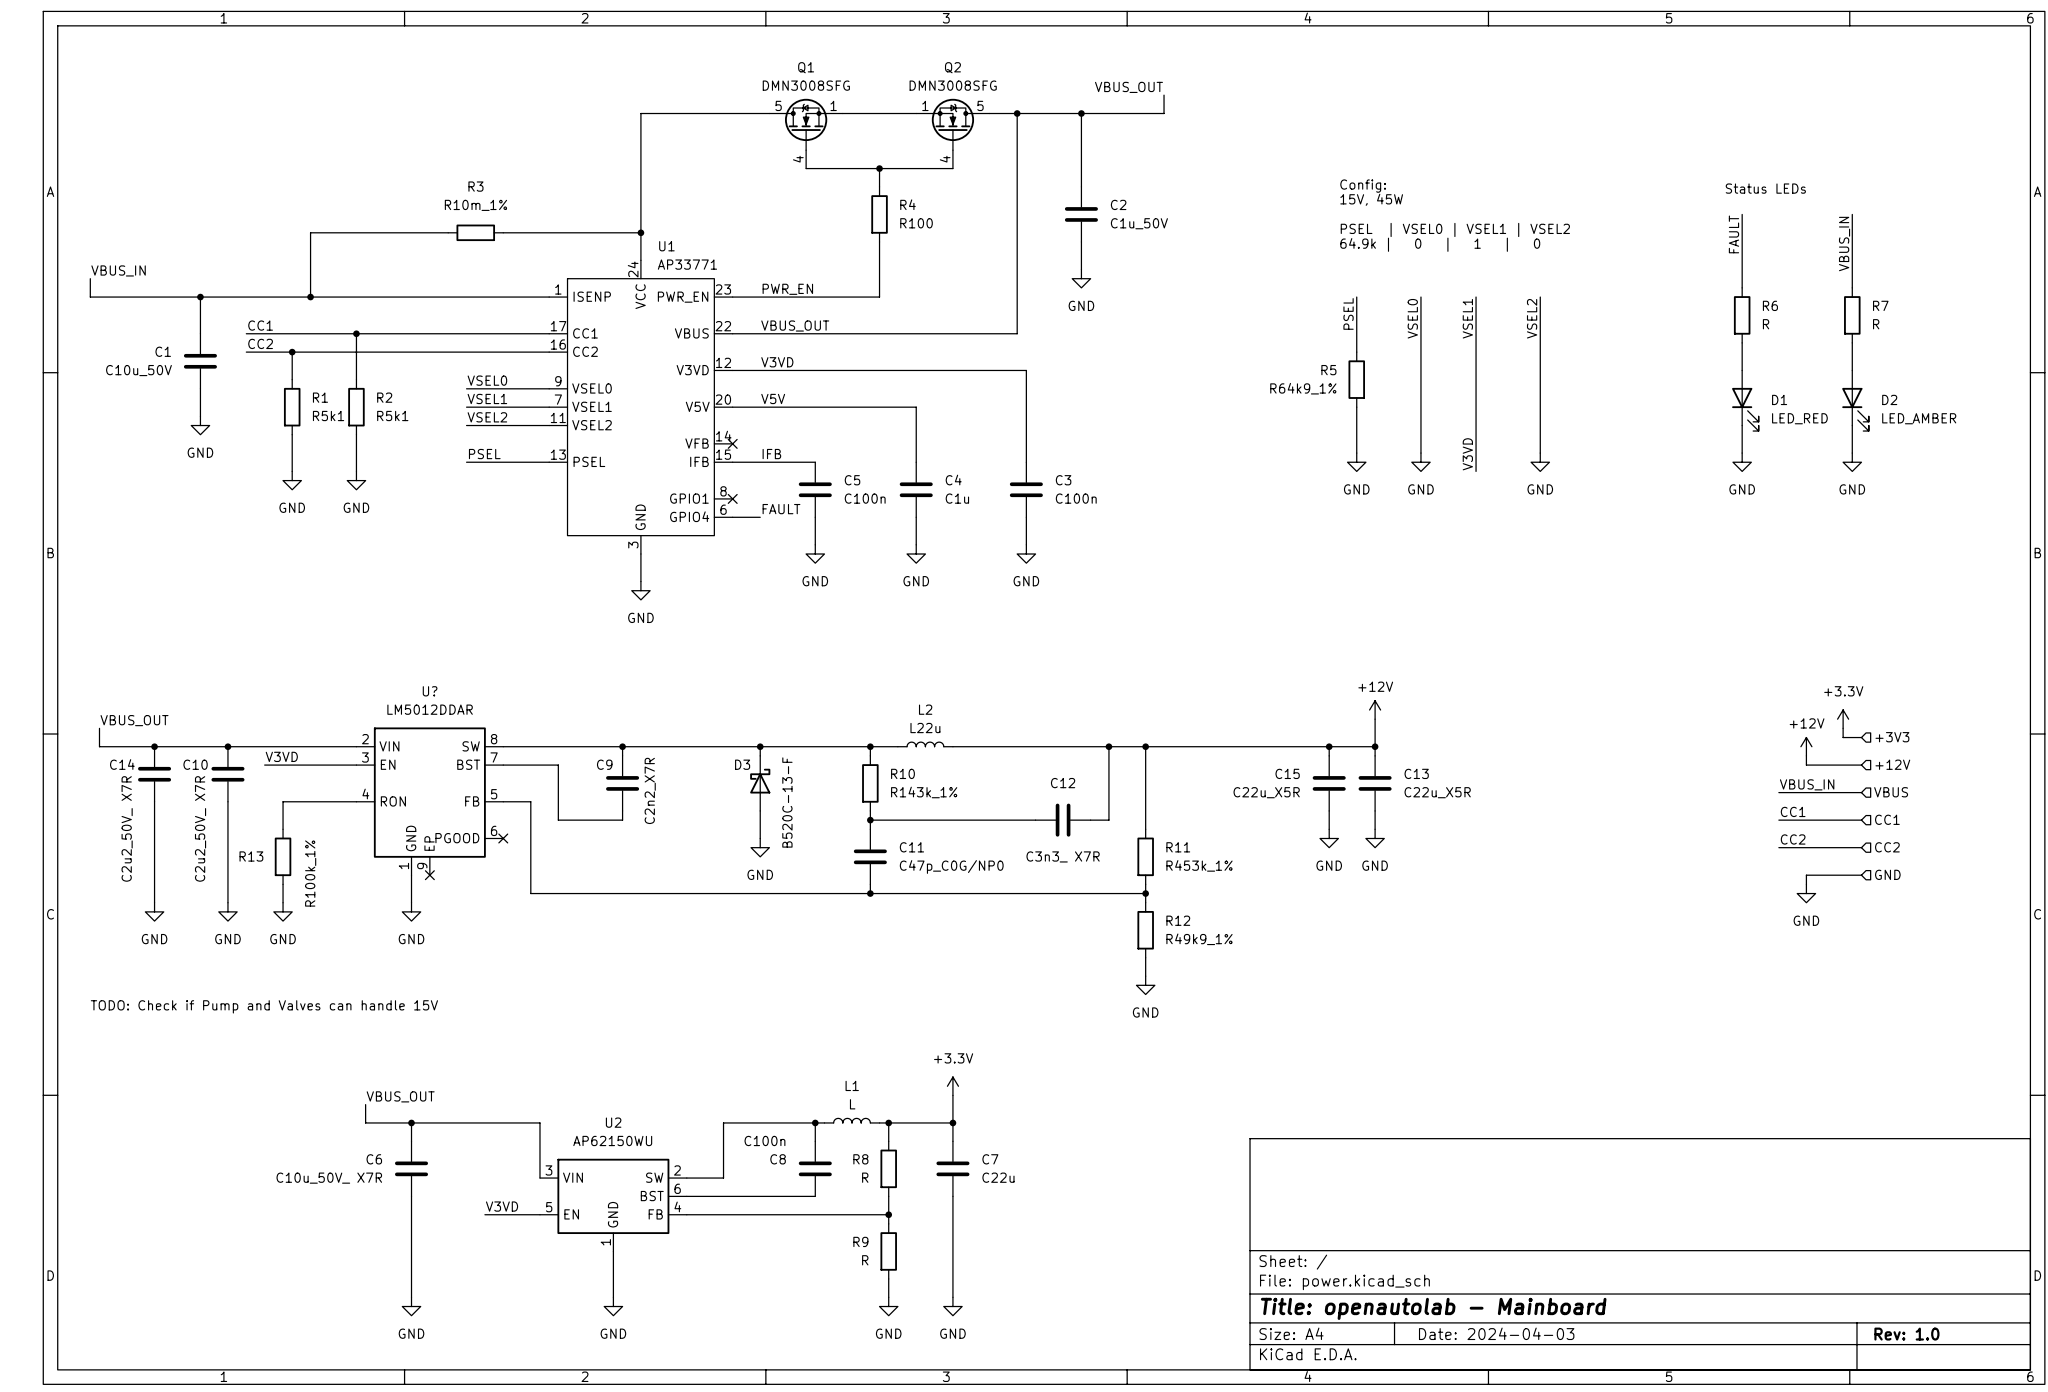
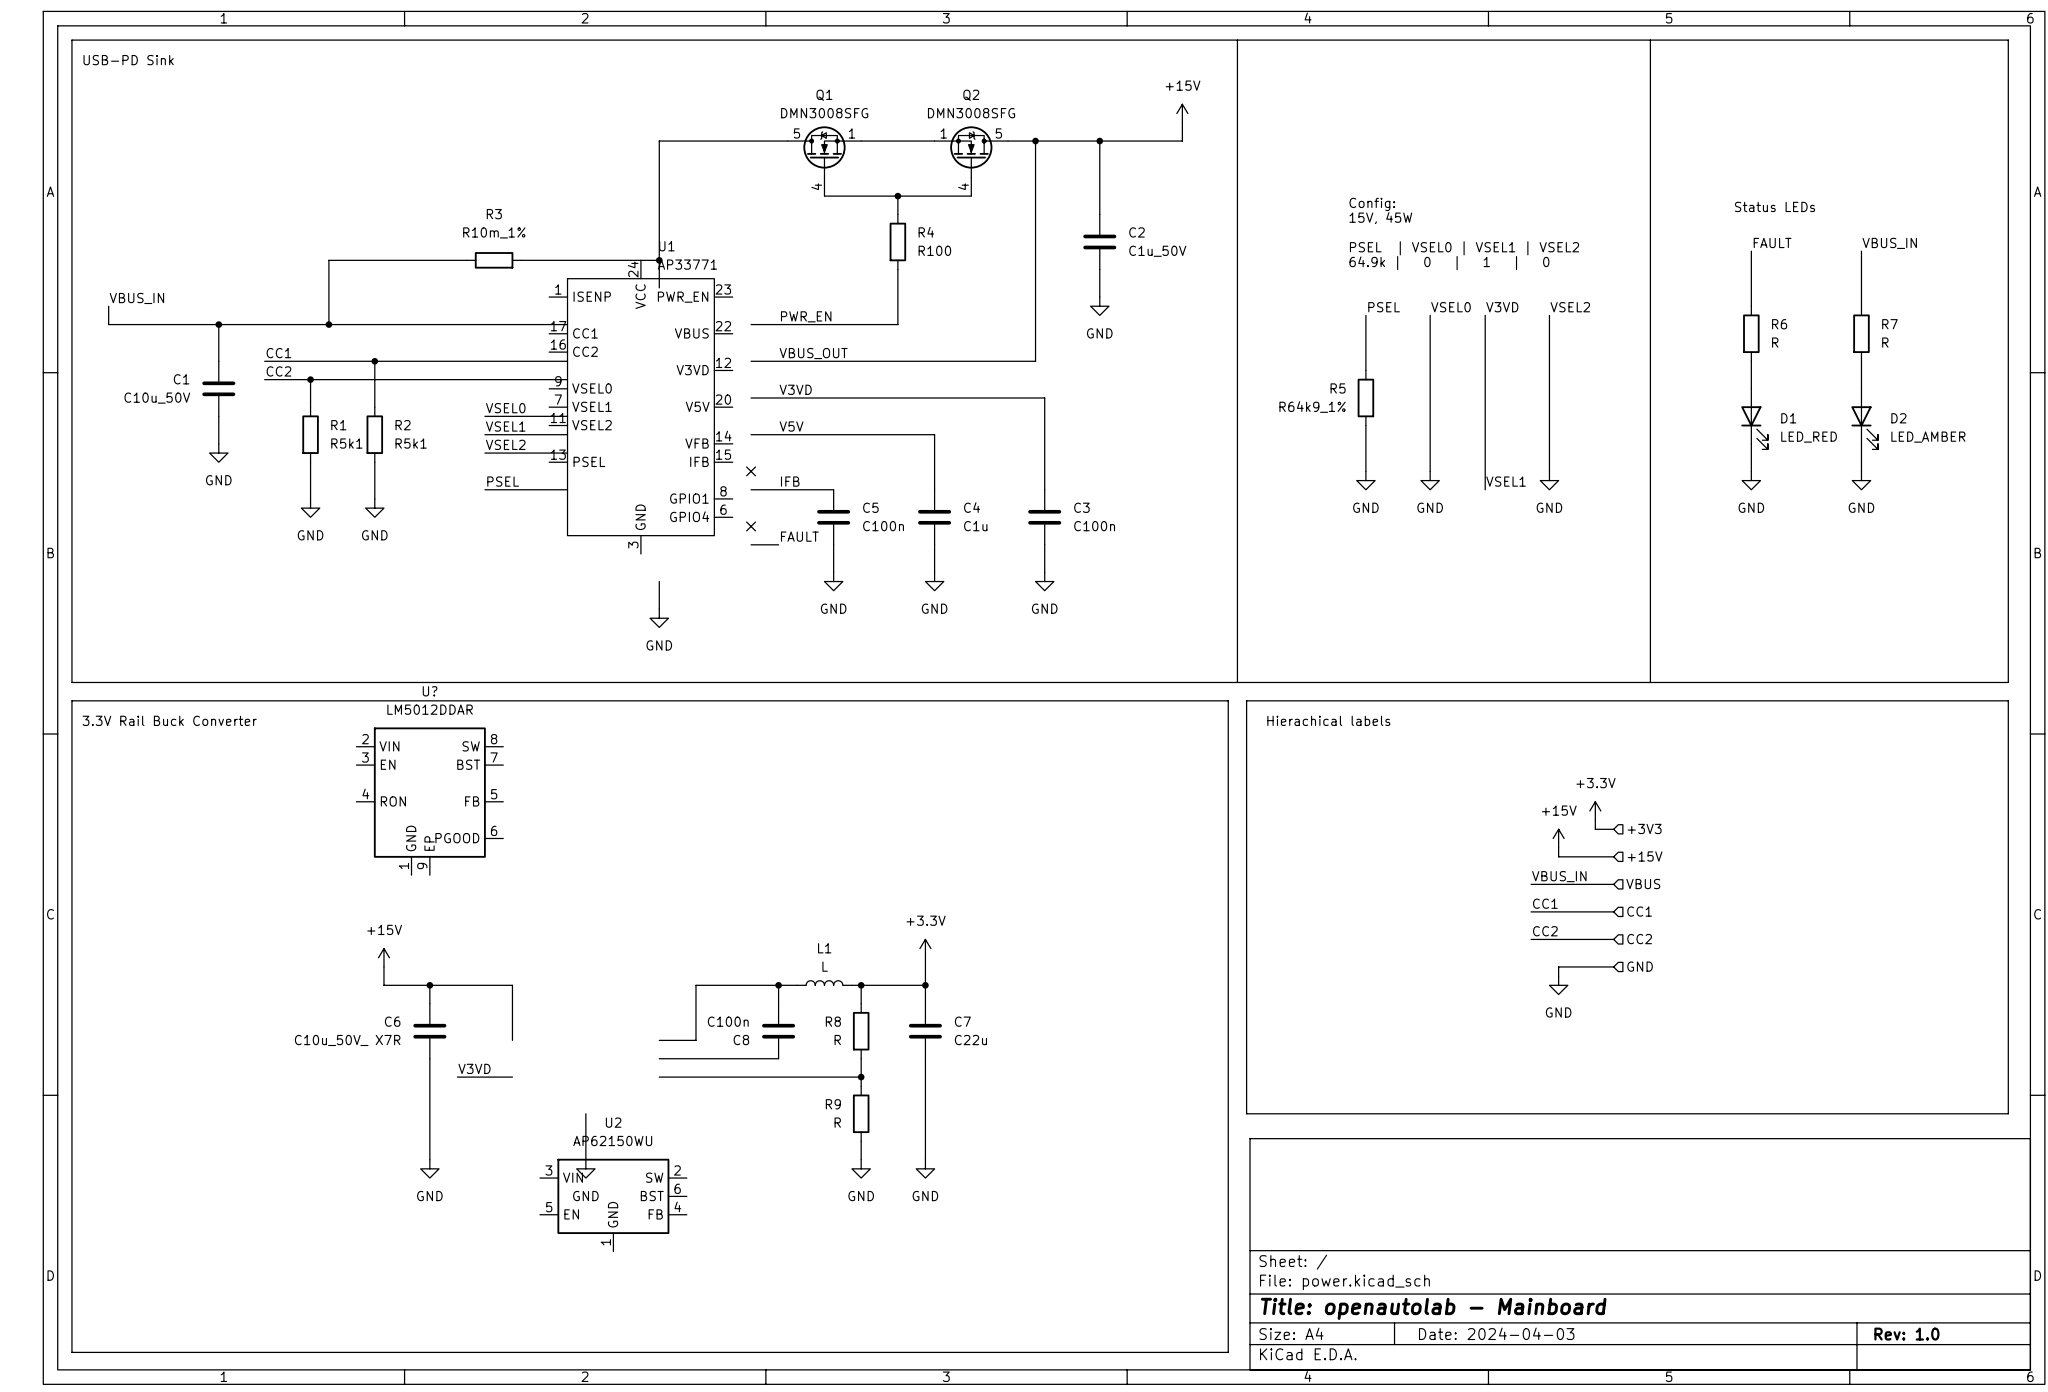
line: none -> (71, 40) (71, 682) (2008, 682) (2008, 40) (71, 40)
line: none -> (1237, 40) (1237, 682)
line: none -> (1650, 40) (1650, 682)
text: none -> USB-PD Sink (128, 60)
label: VBUS_OUT (1128, 87) -> none
wire: (1164, 95) (1164, 113) (989, 113) -> (1182, 122) (1182, 141) (1008, 141)
wire: (769, 113) (640, 113) (640, 260) -> (787, 141) (659, 141) (659, 287)
wire: (842, 113) (916, 113) -> (861, 141) (934, 141)
wire: (1017, 113) (1017, 333) (732, 333) -> (1035, 141) (1035, 361) (751, 361)
junction: (1017, 113) -> none
wire: (1081, 113) (1081, 186) -> (1099, 141) (1099, 214)
junction: (1081, 113) -> none
power symbol: none -> +15V (1182, 113)
Q1 position: (806, 133) -> (824, 161)
Q2 position: (952, 133) -> (971, 161)
junction: none -> (1035, 141)
junction: none -> (1099, 141)
wire: (806, 168) (952, 168) -> (824, 196) (971, 196)
wire: (879, 168) (879, 186) -> (897, 196) (897, 214)
junction position: (879, 168) -> (897, 196)
text position: Config: (1363, 186) -> Config: (1372, 204)
text position: Status LEDs (1765, 188) -> Status LEDs (1775, 206)
text position: 15V, 45W (1371, 199) -> 15V, 45W (1380, 218)
R4 position: (879, 214) -> (897, 241)
C2 position: (1081, 214) -> (1099, 241)
wire: (1742, 214) (1742, 287) -> none
wire: (1852, 214) (1852, 287) -> none
text position: PSEL | VSEL0 | VSEL1 | VSEL2 (1455, 229) -> PSEL | VSEL0 | VSEL1 | VSEL2 (1464, 248)
wire: (448, 232) (310, 232) (310, 297) -> (466, 260) (328, 260) (328, 324)
R3 position: (475, 232) -> (494, 260)
wire: (503, 232) (640, 232) -> (521, 260) (659, 260)
junction position: (640, 232) -> (659, 260)
label rotation: 0° (1733, 234) -> 90° clockwise (1772, 242)
wire: (879, 241) (879, 297) (732, 297) -> (897, 269) (897, 324) (751, 324)
wire: (1081, 241) (1081, 269) -> (1099, 269) (1099, 297)
text position: 64.9k | 0 | 1 | 0 (1440, 244) -> 64.9k | 0 | 1 | 0 (1449, 263)
label rotation: 0° (1844, 244) -> 90° clockwise (1889, 243)
wire: none -> (1751, 251) (1751, 306)
wire: none -> (1861, 251) (1861, 306)
label position: VBUS_IN (118, 270) -> VBUS_IN (136, 298)
wire: (90, 278) (90, 297) (549, 297) -> (108, 306) (108, 324) (567, 324)
power symbol position: GND (1081, 278) -> GND (1099, 306)
label position: PWR_EN (787, 289) -> PWR_EN (806, 316)
wire: (200, 297) (200, 333) -> (218, 324) (218, 361)
junction position: (200, 297) -> (218, 324)
junction: (310, 297) -> none
wire: (1356, 297) (1356, 352) -> (1365, 315) (1365, 370)
wire: (1420, 297) (1420, 453) -> (1430, 315) (1430, 471)
wire: (1476, 297) (1476, 471) -> (1485, 315) (1485, 489)
wire: (1540, 297) (1540, 453) -> (1549, 315) (1549, 471)
label rotation: 0° (1348, 313) -> 90° clockwise (1384, 307)
R6 position: (1742, 315) -> (1751, 333)
R7 position: (1852, 315) -> (1861, 333)
label rotation: 0° (1412, 318) -> 90° clockwise (1450, 307)
label: VSEL1 (1467, 318) -> none
label rotation: 0° (1532, 318) -> 90° clockwise (1570, 307)
junction: none -> (328, 324)
label position: CC1 (260, 325) -> CC1 (278, 353)
label position: VBUS_OUT (795, 326) -> VBUS_OUT (813, 353)
wire: (246, 333) (549, 333) -> (264, 361) (567, 361)
wire: (356, 333) (356, 379) -> (374, 361) (374, 407)
junction: (356, 333) -> none
wire: (1742, 342) (1742, 370) -> (1751, 361) (1751, 388)
wire: (1852, 342) (1852, 370) -> (1861, 361) (1861, 388)
label position: CC2 (260, 343) -> CC2 (278, 371)
wire: (246, 352) (549, 352) -> (264, 379) (567, 379)
wire: (292, 352) (292, 379) -> (310, 379) (310, 407)
junction: (292, 352) -> none
C1 position: (200, 361) -> (218, 388)
junction: none -> (374, 361)
label position: V3VD (777, 362) -> V3VD (795, 389)
wire: (732, 370) (1026, 370) (1026, 462) -> (751, 397) (1044, 397) (1044, 489)
junction: none -> (310, 379)
R5 position: (1356, 379) -> (1365, 397)
label position: VSEL0 (487, 380) -> VSEL0 (505, 408)
wire: (200, 388) (200, 416) -> (218, 416) (218, 443)
wire: (466, 388) (549, 388) -> (484, 416) (567, 416)
label position: VSEL1 (487, 398) -> VSEL1 (505, 426)
label position: V5V (773, 398) -> V5V (791, 426)
D1 position: (1745, 400) -> (1754, 419)
D2 position: (1855, 400) -> (1864, 419)
R1 position: (292, 407) -> (310, 434)
R2 position: (356, 407) -> (374, 434)
wire: (466, 407) (549, 407) -> (484, 434) (567, 434)
wire: (732, 407) (916, 407) (916, 462) -> (751, 434) (934, 434) (934, 489)
wire: (1356, 407) (1356, 453) -> (1365, 425) (1365, 471)
label position: VSEL2 (487, 417) -> VSEL2 (505, 444)
power symbol position: GND (200, 425) -> GND (218, 453)
wire: (466, 425) (549, 425) -> (484, 453) (567, 453)
wire: (1742, 425) (1742, 453) -> (1751, 443) (1751, 471)
wire: (1852, 425) (1852, 453) -> (1861, 443) (1861, 471)
wire: (292, 434) (292, 471) -> (310, 462) (310, 498)
wire: (356, 434) (356, 471) -> (374, 462) (374, 498)
no-connect mark: (732, 443) -> none
label position: PSEL (484, 454) -> PSEL (503, 481)
label position: IFB (771, 454) -> IFB (790, 481)
label rotation: 0° (1467, 454) -> 90° clockwise (1502, 307)
label position: V3VD (1467, 454) -> V3VD (1502, 307)
wire: (466, 462) (549, 462) -> (484, 489) (567, 489)
wire: (732, 462) (815, 462) -> (751, 489) (833, 489)
power symbol position: GND (1356, 462) -> GND (1365, 480)
power symbol position: GND (1420, 462) -> GND (1430, 480)
power symbol position: GND (1540, 462) -> GND (1549, 480)
power symbol position: GND (1742, 462) -> GND (1751, 480)
power symbol position: GND (1852, 462) -> GND (1861, 480)
no-connect mark: none -> (751, 471)
power symbol: GND (292, 480) -> none
power symbol: GND (356, 480) -> none
label: none -> VSEL1 (1506, 481)
C5 position: (815, 489) -> (833, 517)
C4 position: (916, 489) -> (934, 517)
C3 position: (1026, 489) -> (1044, 517)
no-connect mark: (732, 498) -> none
power symbol: none -> GND (310, 508)
power symbol: none -> GND (374, 508)
label position: FAULT (781, 509) -> FAULT (799, 536)
wire: (732, 517) (760, 517) -> (751, 544) (778, 544)
wire: (815, 517) (815, 544) -> (833, 544) (833, 572)
wire: (916, 517) (916, 544) -> (934, 544) (934, 572)
wire: (1026, 517) (1026, 544) -> (1044, 544) (1044, 572)
no-connect mark: none -> (751, 526)
wire: (640, 554) (640, 581) -> (659, 581) (659, 609)
power symbol position: GND (815, 554) -> GND (833, 581)
power symbol position: GND (916, 554) -> GND (934, 581)
power symbol position: GND (1026, 554) -> GND (1044, 581)
power symbol position: GND (640, 590) -> GND (659, 618)
line: none -> (71, 700) (1228, 700) (1228, 1352) (71, 1352) (71, 700)
line: none -> (1246, 700) (2008, 700) (2008, 1113) (1246, 1113) (1246, 700)
power symbol: +12V (1375, 710) -> none
wire: (1375, 719) (1375, 755) -> none
power symbol: +3.3V (1843, 719) -> none
label: VBUS_OUT (134, 720) -> none
text: none -> 3.3V Rail Buck Converter (169, 720)
text: none -> Hierachical labels (1328, 720)
wire: (99, 728) (99, 746) (356, 746) -> none
wire: (1843, 728) (1843, 737) (1861, 737) -> none
hierarchical label: +3V3 (1892, 737) -> none
L2: L22u (925, 744) -> none
junction: (154, 746) -> none
junction: (227, 746) -> none
wire: (503, 746) (897, 746) -> none
wire: (622, 746) (622, 755) -> none
junction: (622, 746) -> none
wire: (760, 746) (760, 755) -> none
junction: (760, 746) -> none
wire: (870, 746) (870, 755) -> none
junction: (870, 746) -> none
wire: (952, 746) (1375, 746) -> none
wire: (1108, 746) (1108, 820) (1090, 820) -> none
junction: (1108, 746) -> none
wire: (1145, 746) (1145, 829) -> none
junction: (1145, 746) -> none
wire: (1329, 746) (1329, 755) -> none
junction: (1329, 746) -> none
junction: (1375, 746) -> none
power symbol: +12V (1806, 746) -> none
wire: (1806, 755) (1806, 765) (1861, 765) -> none
label: V3VD (281, 756) -> none
hierarchical label: +12V (1892, 764) -> none
wire: (264, 765) (356, 765) -> none
wire: (503, 765) (558, 765) (558, 820) (622, 820) (622, 810) -> none
C14: C2u2_50V_ X7R (154, 774) -> none
C10: C2u2_50V_ X7R (227, 774) -> none
C9: C2n2_X7R (622, 783) -> none
D3: B520C-13-F (760, 783) -> none
R10: R143k_1% (870, 783) -> none
C15: C22u_X5R (1329, 783) -> none
C13: C22u_X5R (1375, 783) -> none
label: VBUS_IN (1807, 784) -> none
wire: (1778, 792) (1861, 792) -> none
hierarchical label: VBUS (1891, 792) -> none
wire: (154, 801) (154, 902) -> none
wire: (227, 801) (227, 902) -> none
wire: (356, 801) (283, 801) (283, 829) -> none
wire: (503, 801) (530, 801) (530, 893) (1145, 893) -> none
wire: (760, 810) (760, 838) -> none
wire: (870, 810) (870, 829) -> none
wire: (1329, 810) (1329, 829) -> none
wire: (1375, 810) (1375, 829) -> none
power symbol: none -> +3.3V (1595, 810)
label: CC1 (1793, 811) -> none
hierarchical label: CC1 (1887, 819) -> none
wire: (870, 820) (1035, 820) -> none
junction: (870, 820) -> none
C12: C3n3_ X7R (1063, 820) -> none
wire: none -> (1595, 820) (1595, 829) (1613, 829)
wire: (1778, 820) (1861, 820) -> none
hierarchical label: none -> +3V3 (1644, 828)
no-connect mark: (503, 838) -> none
power symbol: GND (1329, 838) -> none
power symbol: GND (1375, 838) -> none
power symbol: none -> +15V (1558, 838)
label: CC2 (1793, 839) -> none
power symbol: GND (760, 847) -> none
wire: none -> (1558, 847) (1558, 856) (1613, 856)
wire: (1778, 847) (1861, 847) -> none
hierarchical label: CC2 (1887, 847) -> none
R13: R100k_1% (283, 856) -> none
C11: C47p_C0G/NP0 (870, 856) -> none
R11: R453k_1% (1145, 856) -> none
hierarchical label: none -> +15V (1645, 856)
hierarchical label: GND (1887, 874) -> none
wire: (411, 875) (411, 902) -> none
no-connect mark: (429, 875) -> none
wire: (1861, 875) (1806, 875) (1806, 884) -> none
label: none -> VBUS_IN (1559, 876)
wire: (283, 884) (283, 902) -> none
wire: (870, 884) (870, 893) -> none
wire: (1145, 884) (1145, 902) -> none
wire: none -> (1531, 884) (1613, 884)
hierarchical label: none -> VBUS (1643, 884)
junction: (870, 893) -> none
junction: (1145, 893) -> none
power symbol: GND (1806, 893) -> none
label: none -> CC1 (1545, 903)
power symbol: GND (154, 911) -> none
power symbol: GND (227, 911) -> none
power symbol: GND (283, 911) -> none
power symbol: GND (411, 911) -> none
wire: none -> (1531, 911) (1613, 911)
hierarchical label: none -> CC1 (1639, 911)
R12: R49k9_1% (1145, 930) -> none
label: none -> CC2 (1545, 931)
wire: none -> (1531, 939) (1613, 939)
hierarchical label: none -> CC2 (1639, 939)
power symbol: none -> +15V (383, 957)
wire: (1145, 957) (1145, 976) -> none
wire: none -> (383, 966) (383, 985) (512, 985) (512, 1040)
wire: none -> (1613, 966) (1558, 966) (1558, 976)
hierarchical label: none -> GND (1640, 966)
junction: none -> (429, 985)
junction: none -> (778, 985)
junction: none -> (861, 985)
junction: none -> (925, 985)
power symbol: GND (1145, 985) -> none
power symbol: none -> GND (1558, 985)
text: TODO: Check if Pump and Valves can handle 15V (264, 1006) -> none
wire: none -> (659, 1058) (778, 1058)
junction: none -> (861, 1077)
power symbol position: +3.3V (952, 1086) -> +3.3V (925, 948)
wire: (952, 1095) (952, 1141) -> (925, 957) (925, 1003)
label: VBUS_OUT (400, 1096) -> none
wire: (365, 1104) (365, 1122) (539, 1122) (539, 1178) -> none
L1 position: (852, 1120) -> (824, 983)
wire: (411, 1122) (411, 1141) -> (429, 985) (429, 1003)
junction: (411, 1122) -> none
wire: (815, 1122) (815, 1141) -> (778, 985) (778, 1003)
junction: (815, 1122) -> none
wire: (824, 1122) (723, 1122) (723, 1178) (686, 1178) -> (796, 985) (695, 985) (695, 1040) (659, 1040)
wire: (879, 1122) (952, 1122) -> (852, 985) (925, 985)
wire: (888, 1122) (888, 1141) -> (861, 985) (861, 1003)
junction: (888, 1122) -> none
junction: (952, 1122) -> none
C8 value position: C100n (764, 1140) -> C100n (728, 1021)
C8 name position: C8 (778, 1159) -> C8 (741, 1040)
C6 position: (411, 1168) -> (429, 1031)
power symbol: none -> GND (429, 1168)
power symbol: none -> GND (585, 1168)
C8 position: (815, 1168) -> (778, 1031)
power symbol: none -> GND (861, 1168)
R8 position: (888, 1168) -> (861, 1031)
power symbol: none -> GND (925, 1168)
C7 position: (952, 1168) -> (925, 1031)
wire: (411, 1196) (411, 1297) -> (429, 1058) (429, 1159)
wire: (686, 1196) (815, 1196) -> none
wire: (888, 1196) (888, 1223) -> (861, 1058) (861, 1086)
wire: (952, 1196) (952, 1297) -> (925, 1058) (925, 1159)
label position: V3VD (502, 1206) -> V3VD (474, 1068)
wire: (484, 1214) (539, 1214) -> (457, 1077) (512, 1077)
wire: (686, 1214) (888, 1214) -> (659, 1077) (861, 1077)
junction: (888, 1214) -> none
wire: (613, 1251) (613, 1297) -> (585, 1113) (585, 1159)
R9 position: (888, 1251) -> (861, 1113)
wire: (888, 1278) (888, 1297) -> (861, 1141) (861, 1159)
power symbol: GND (411, 1306) -> none
power symbol: GND (613, 1306) -> none
power symbol: GND (888, 1306) -> none
power symbol: GND (952, 1306) -> none

